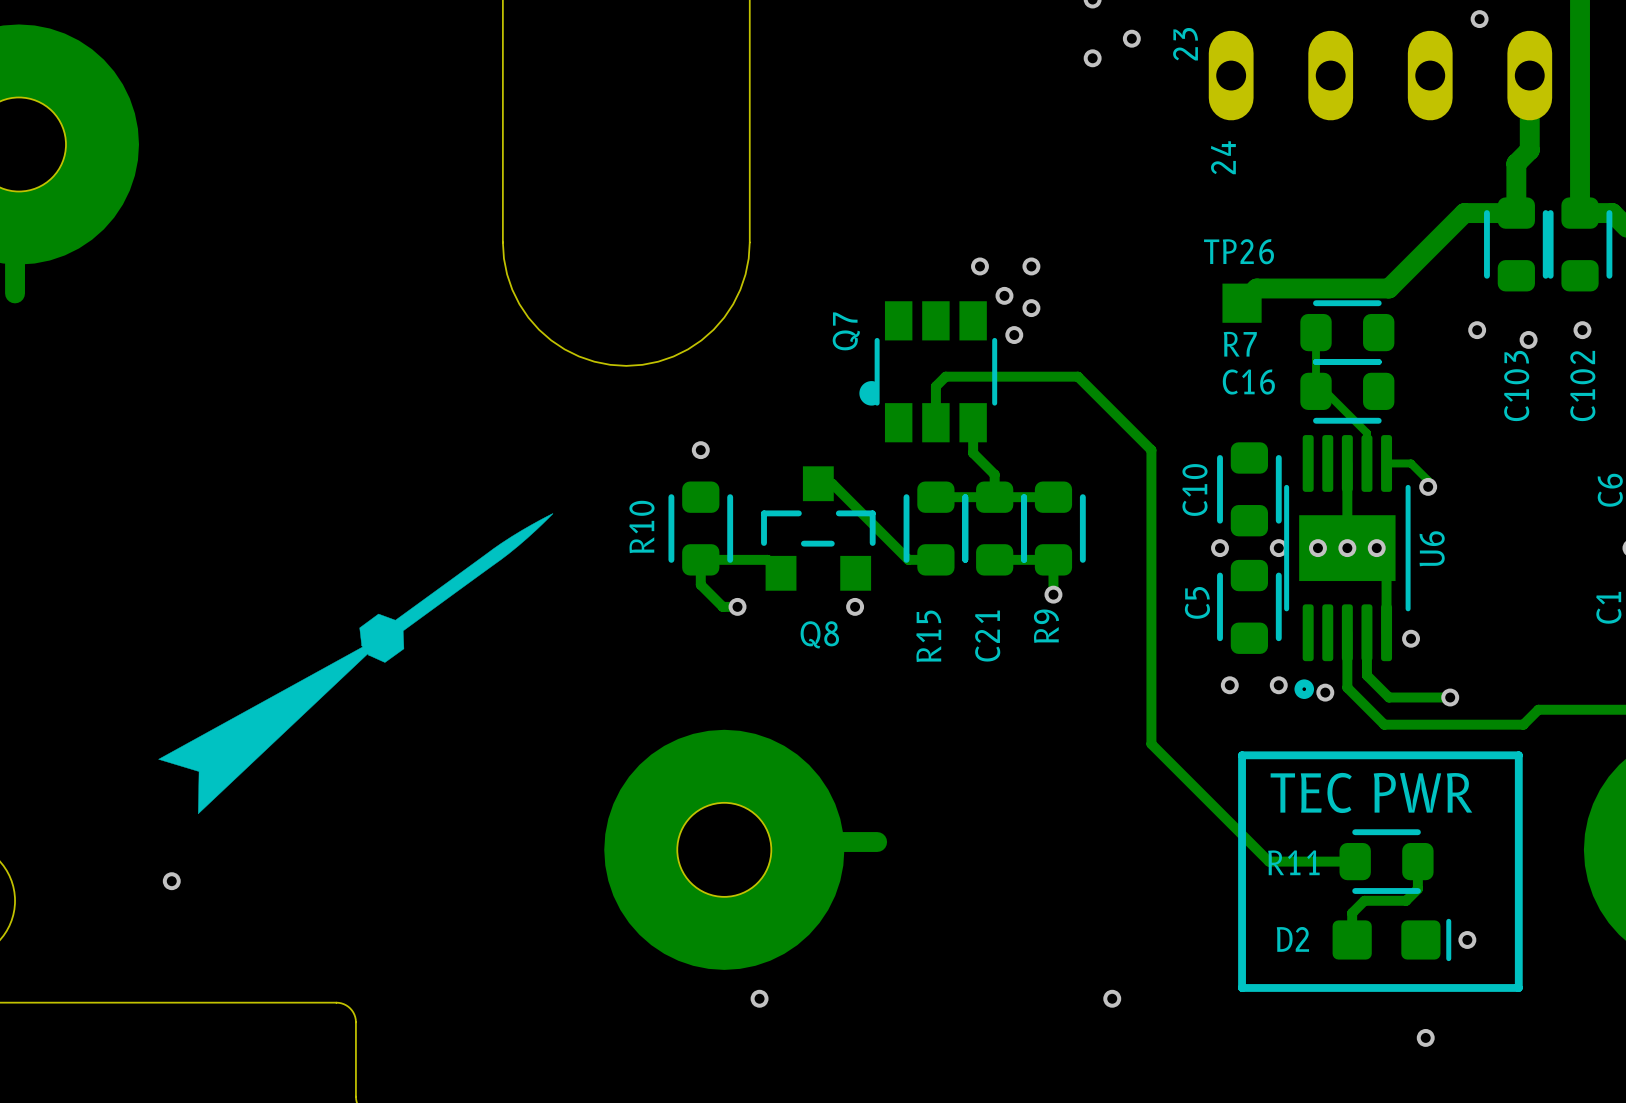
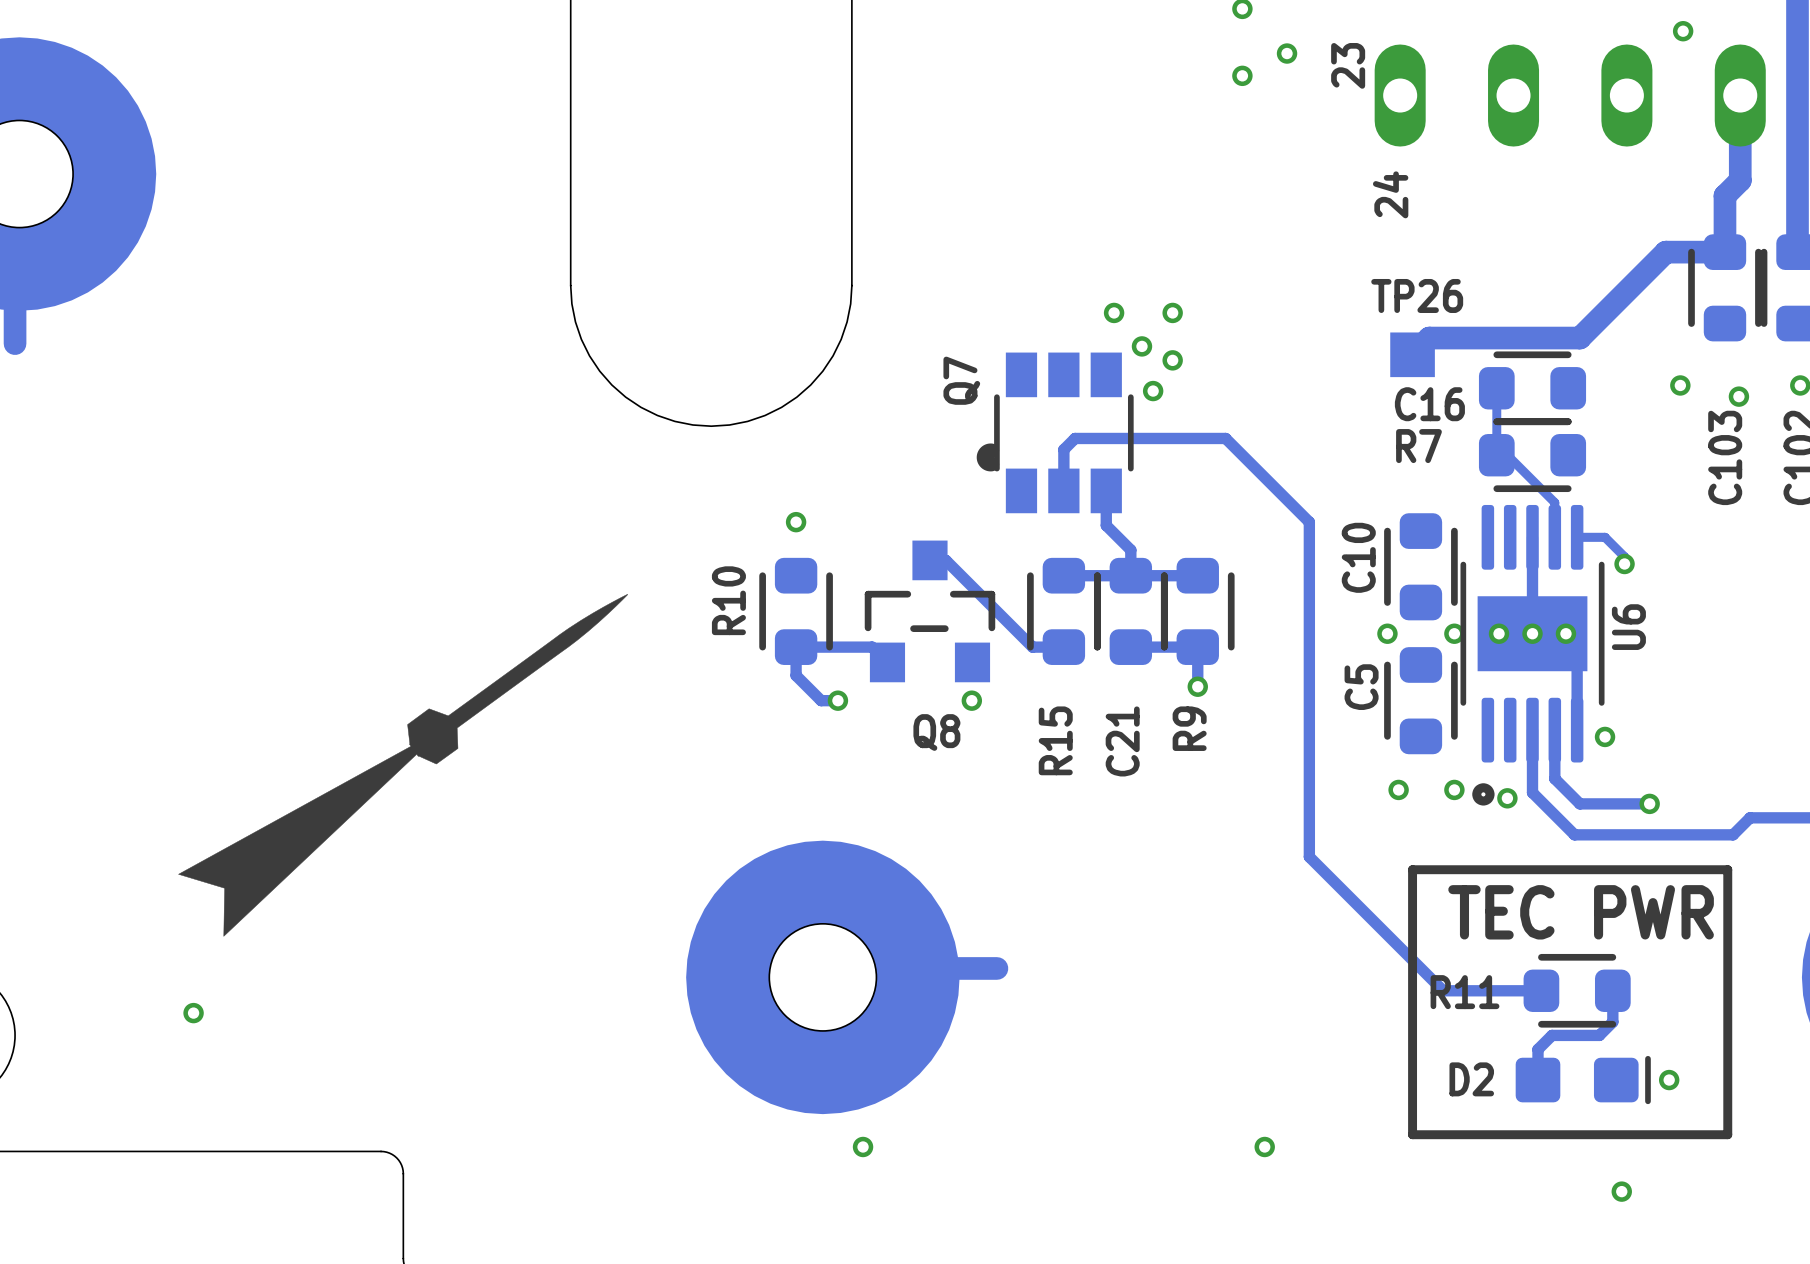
R7 name position: R7 (1240, 344) -> R7 (1418, 446)
C16 name position: C16 (1248, 382) -> C16 (1429, 404)

